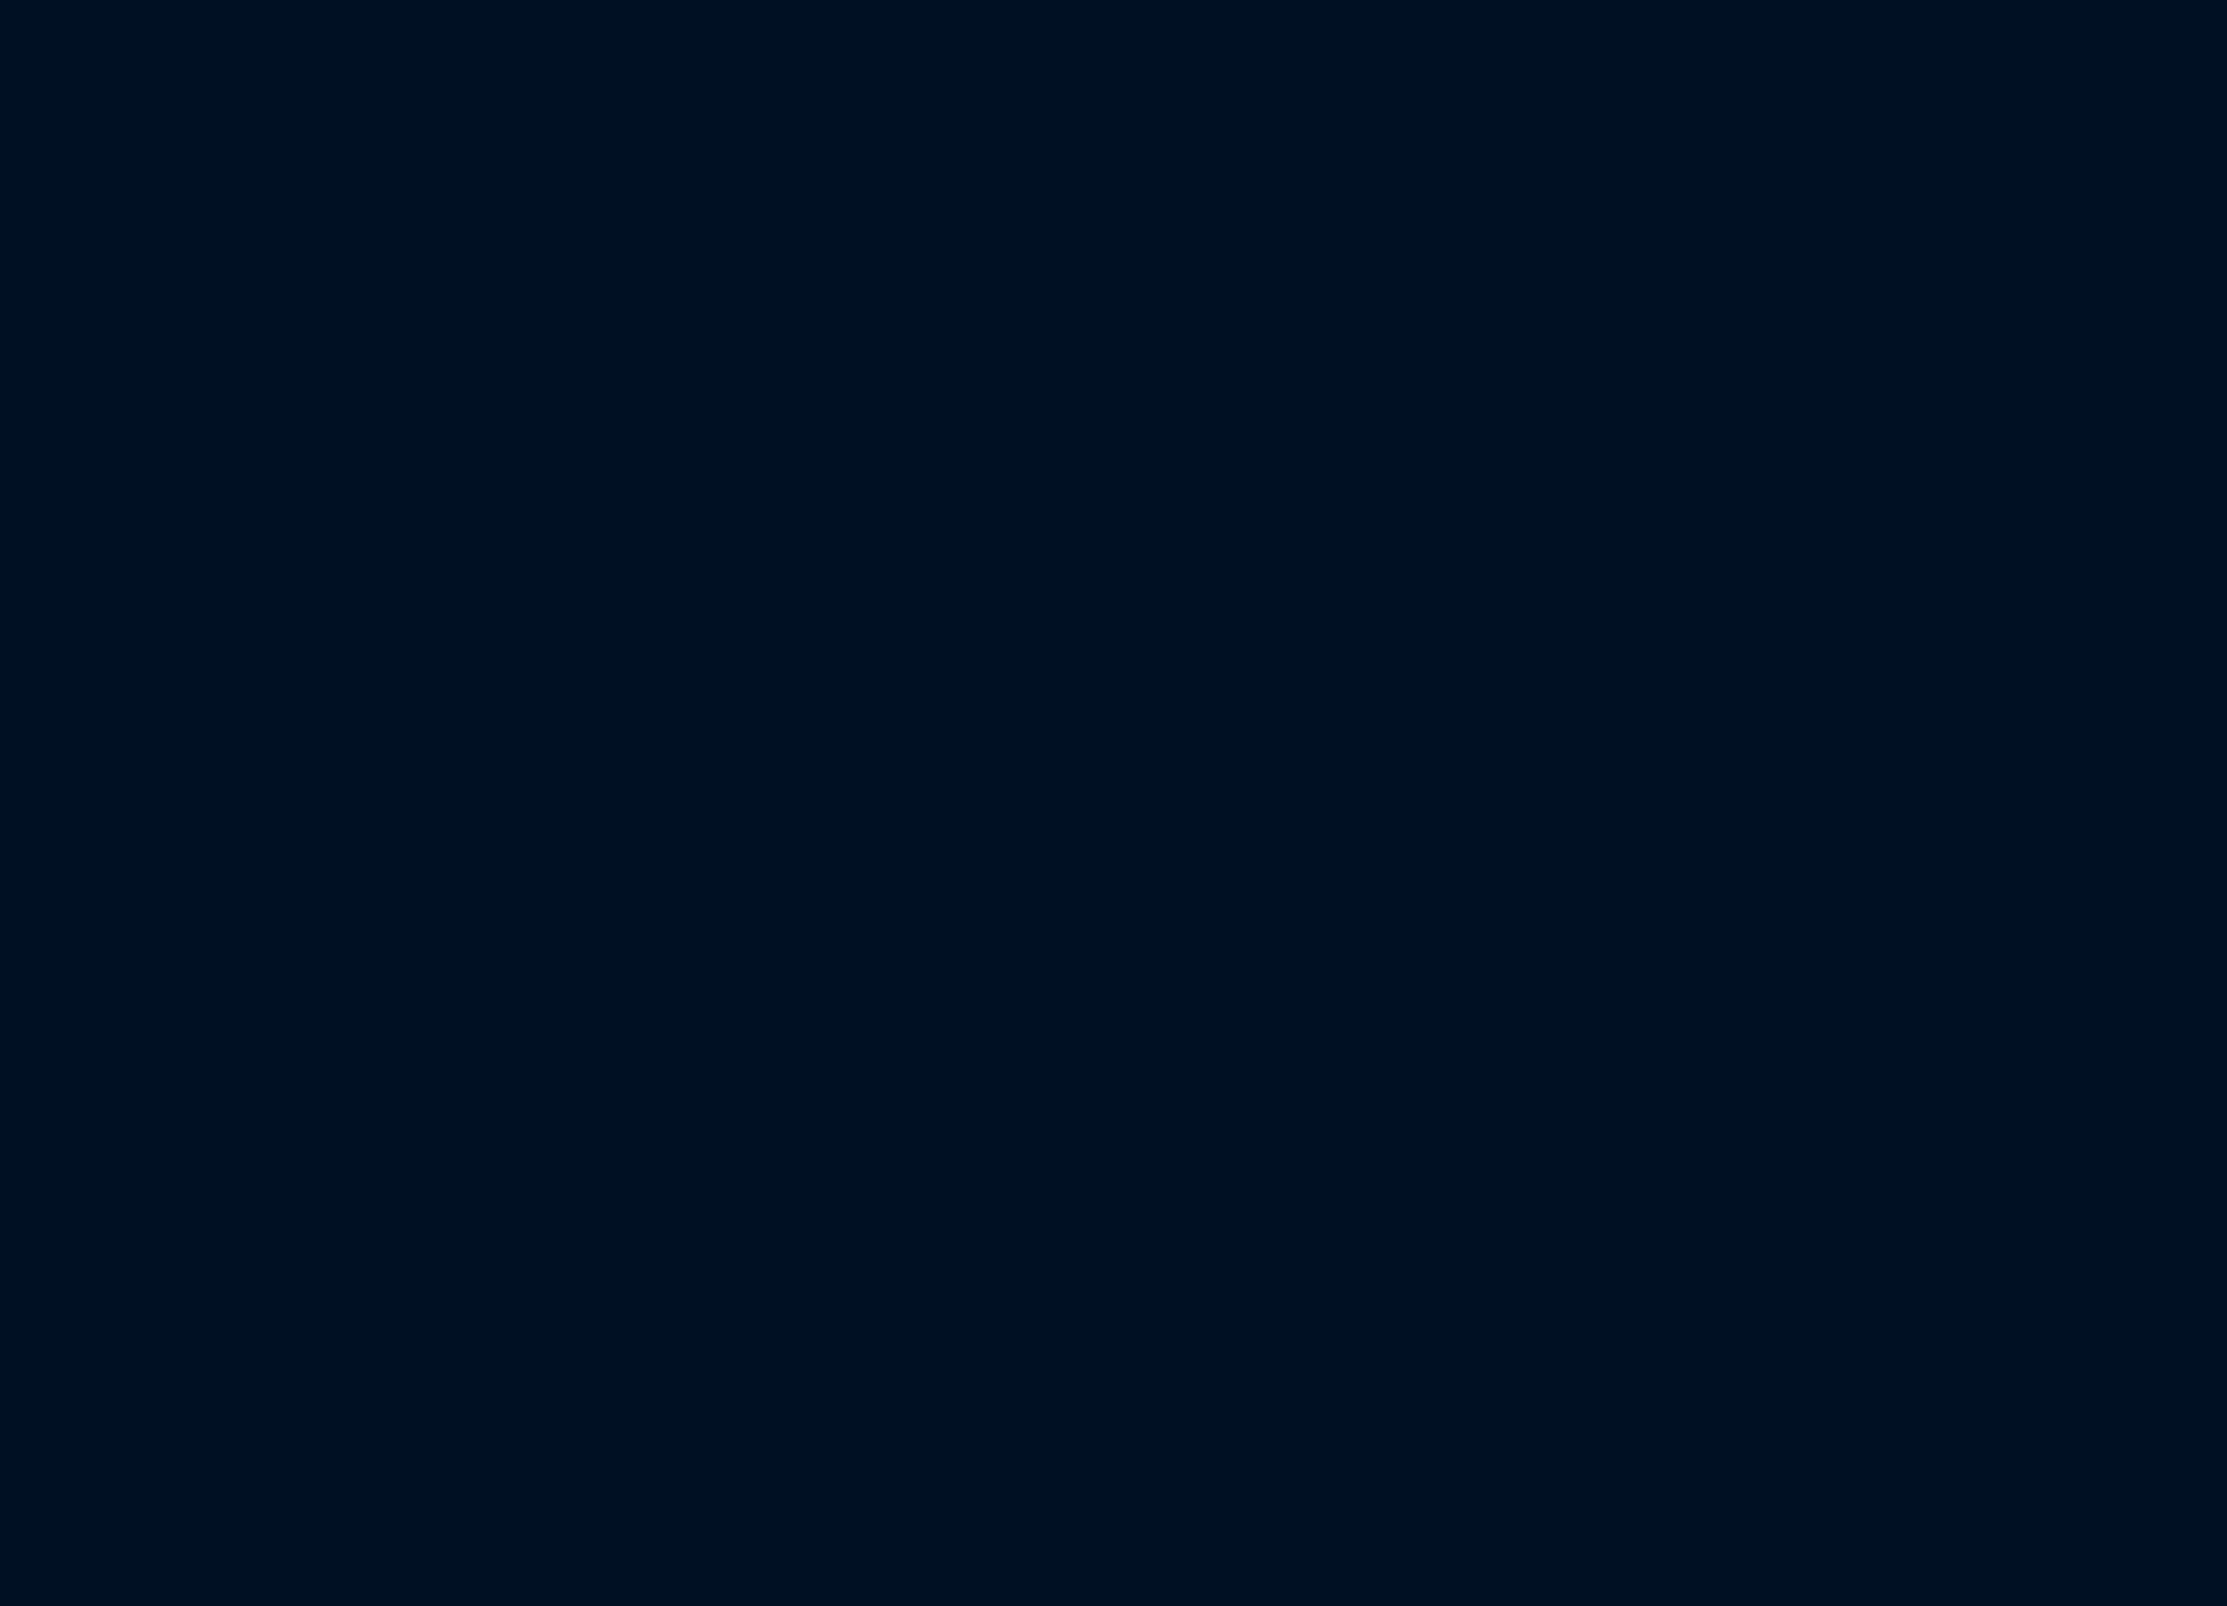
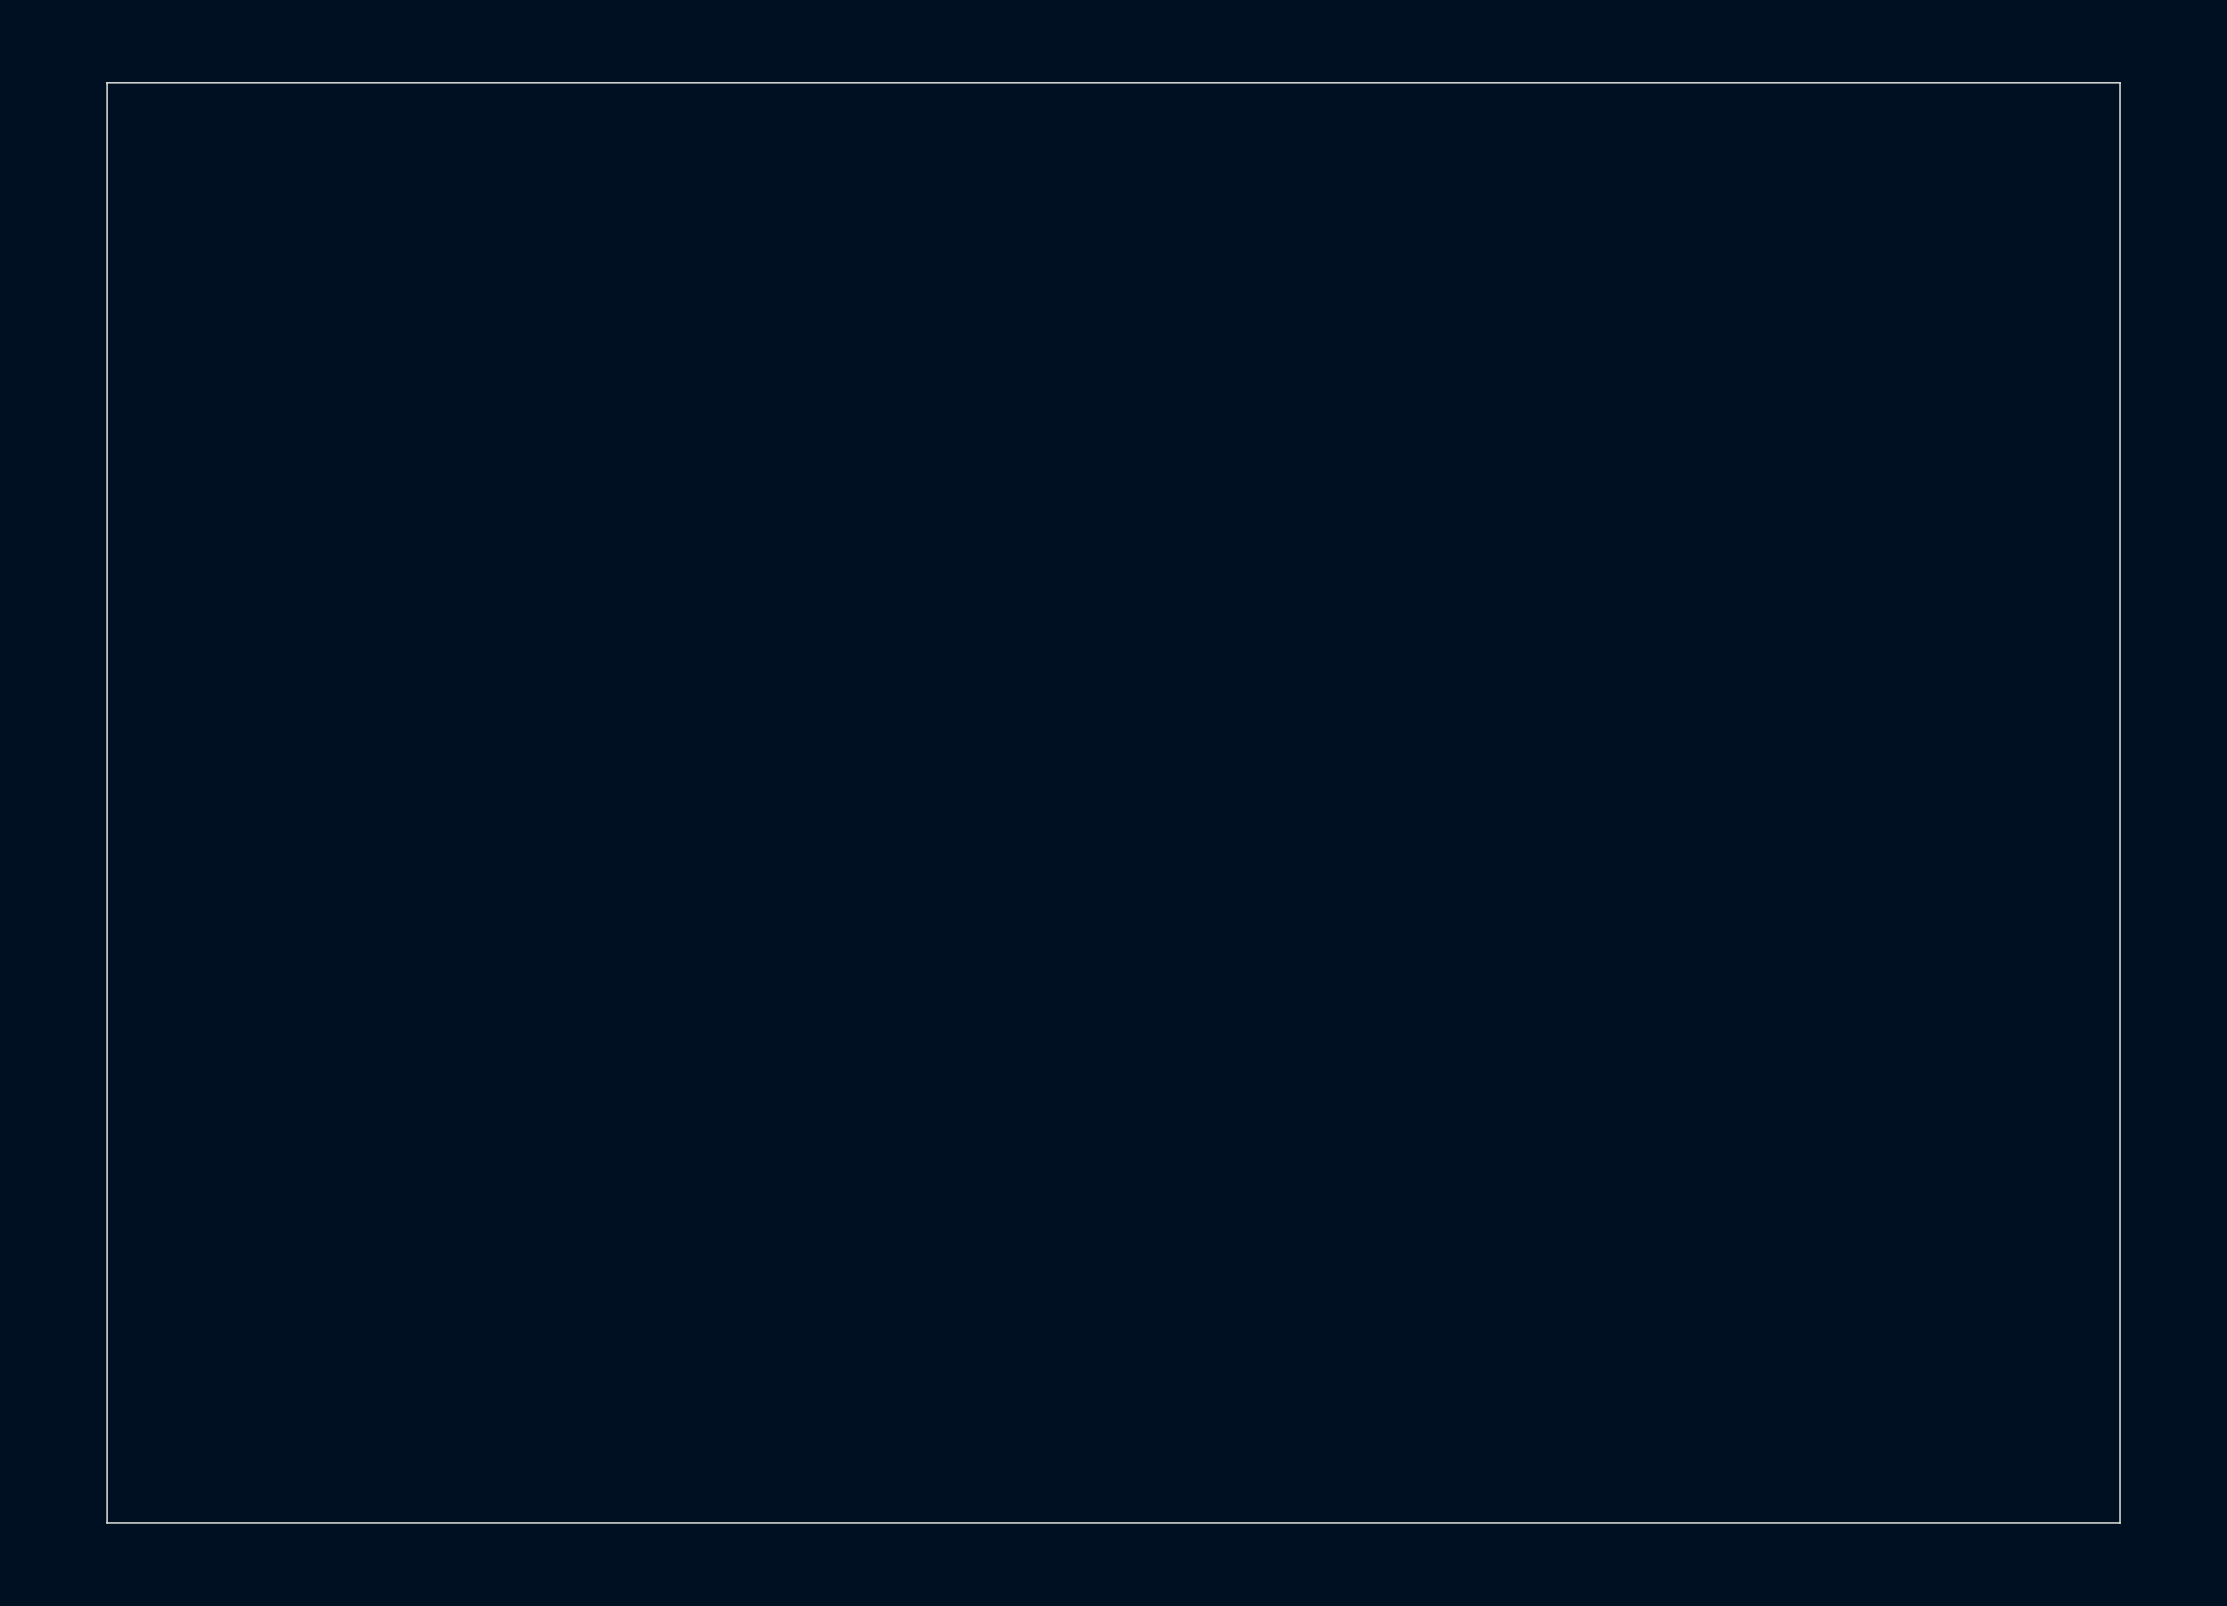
board edge: none -> (2120, 82) (107, 82) (107, 1522) (2120, 1522) (2120, 82)

